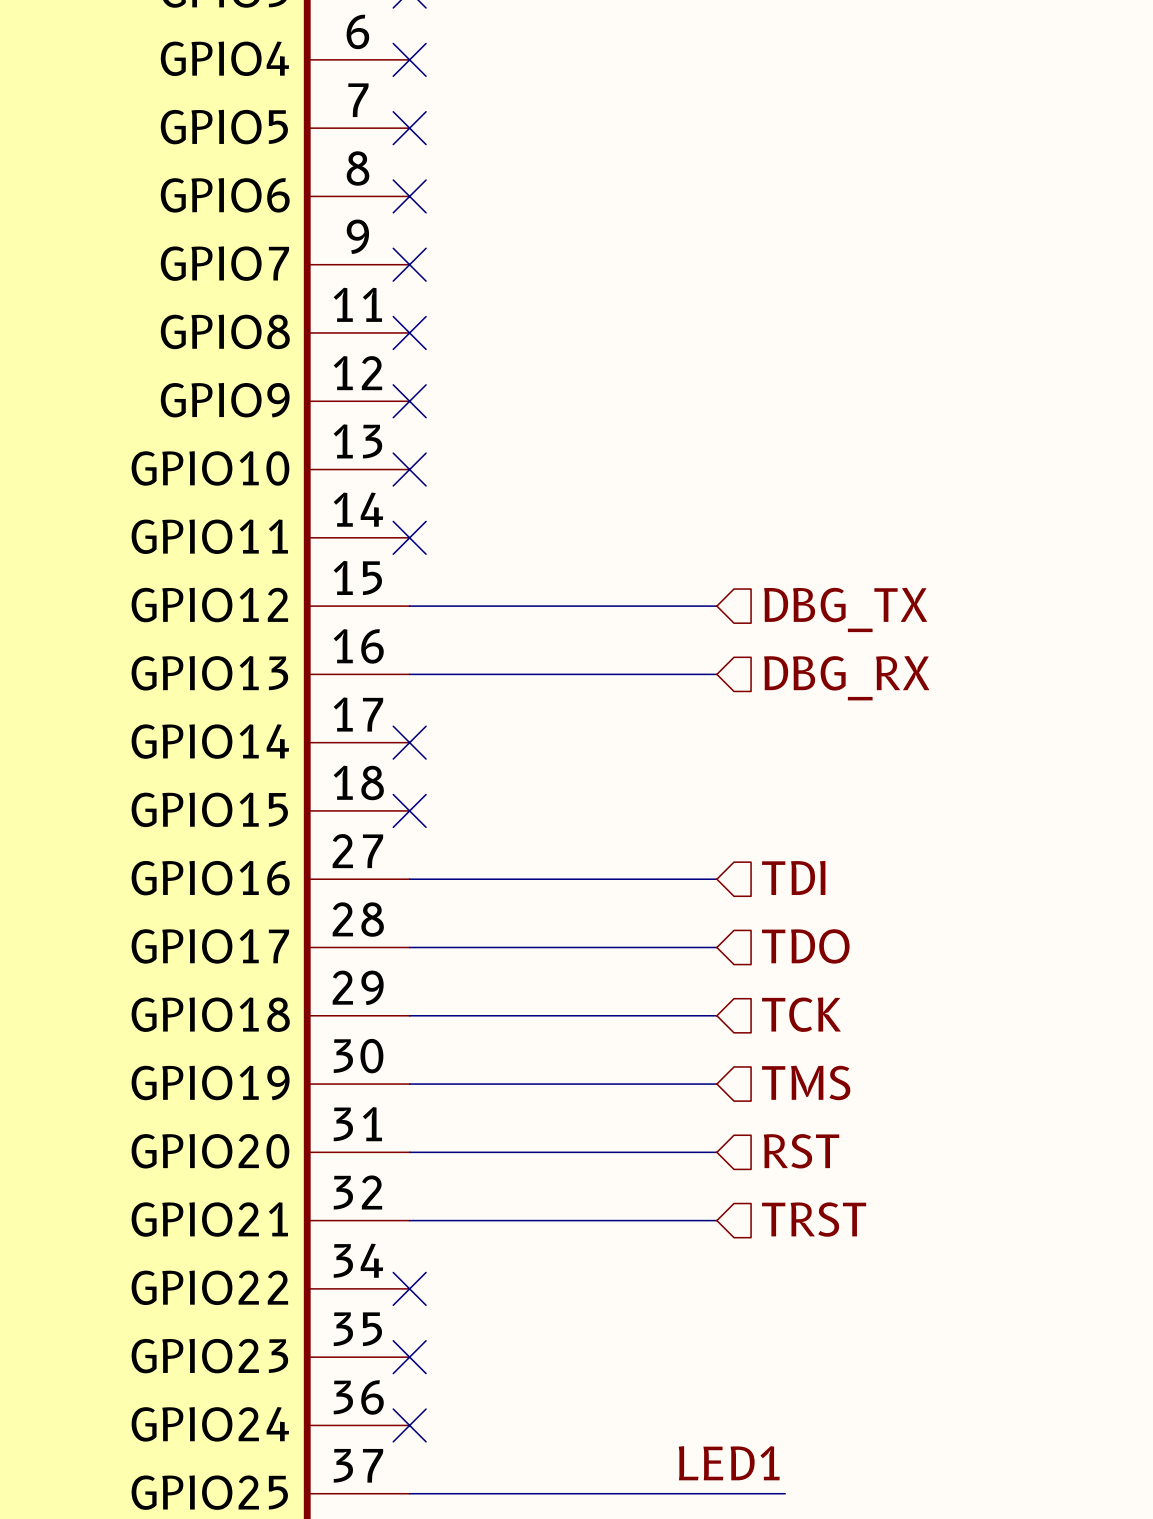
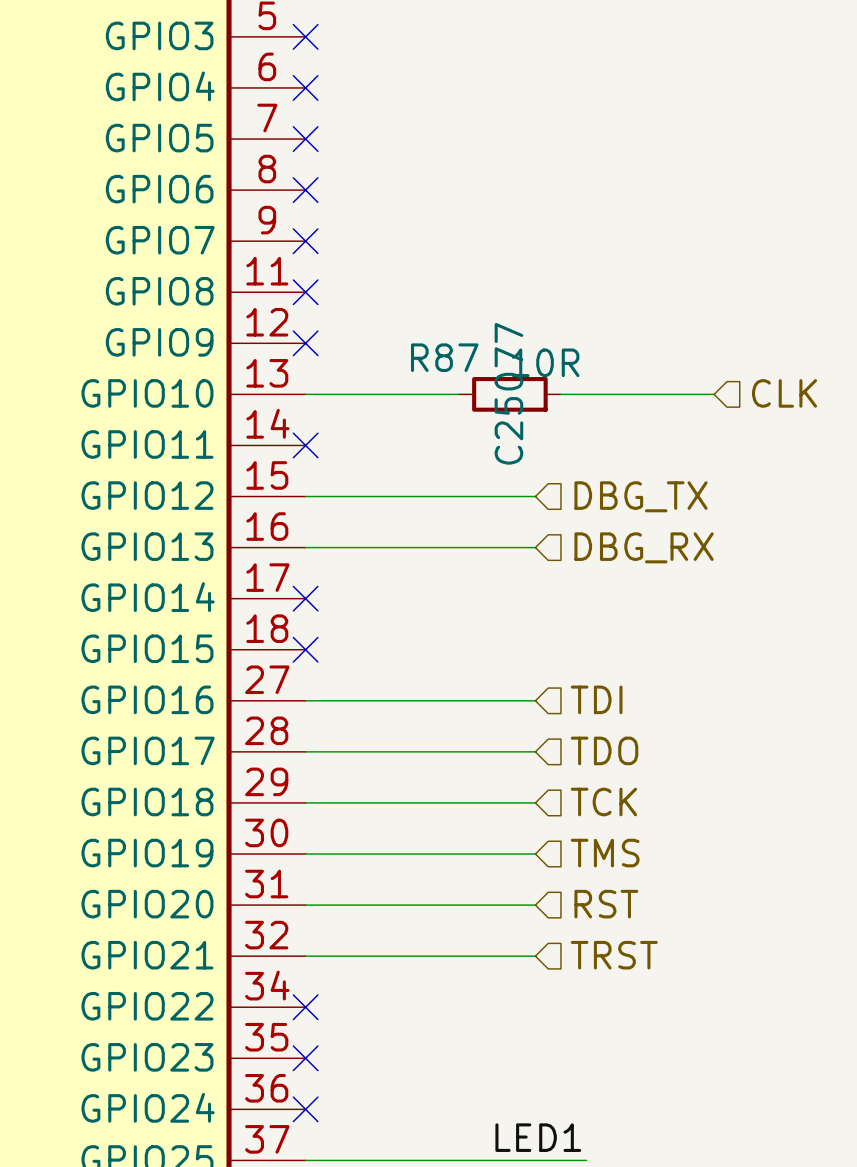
hierarchical label: none -> CLK (784, 393)
wire: none -> (305, 394) (458, 394)
no-connect mark: (409, 469) -> none
R87: none -> 10R (509, 394)
wire: none -> (560, 394) (714, 394)

